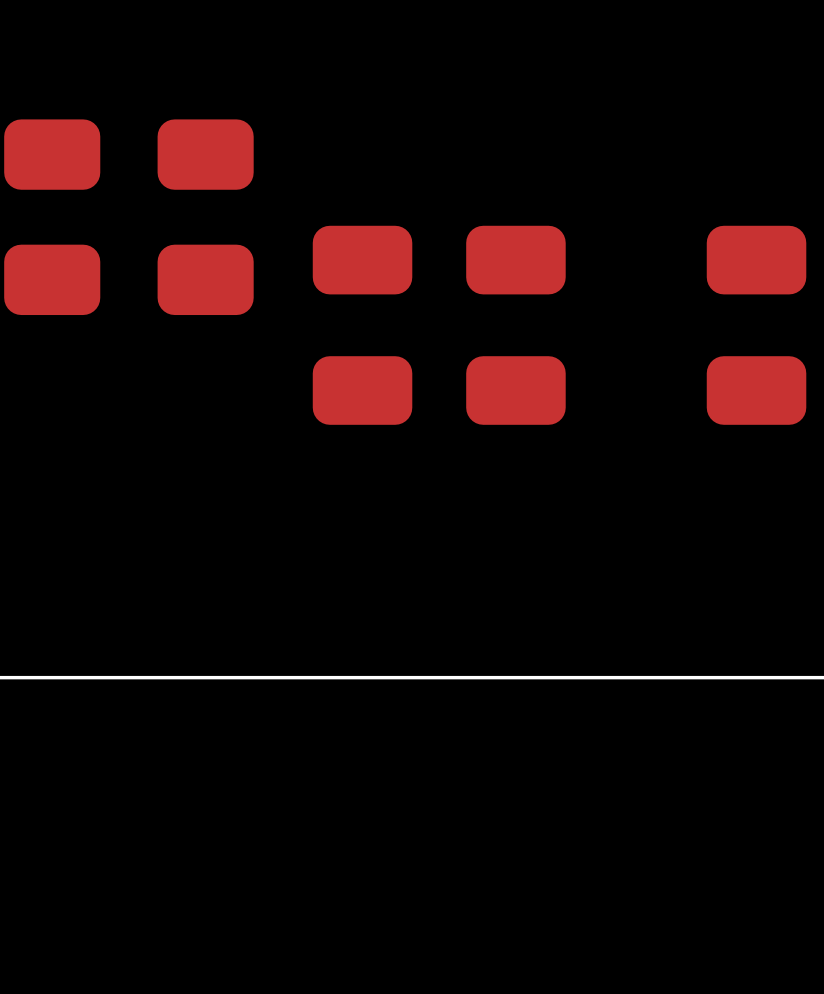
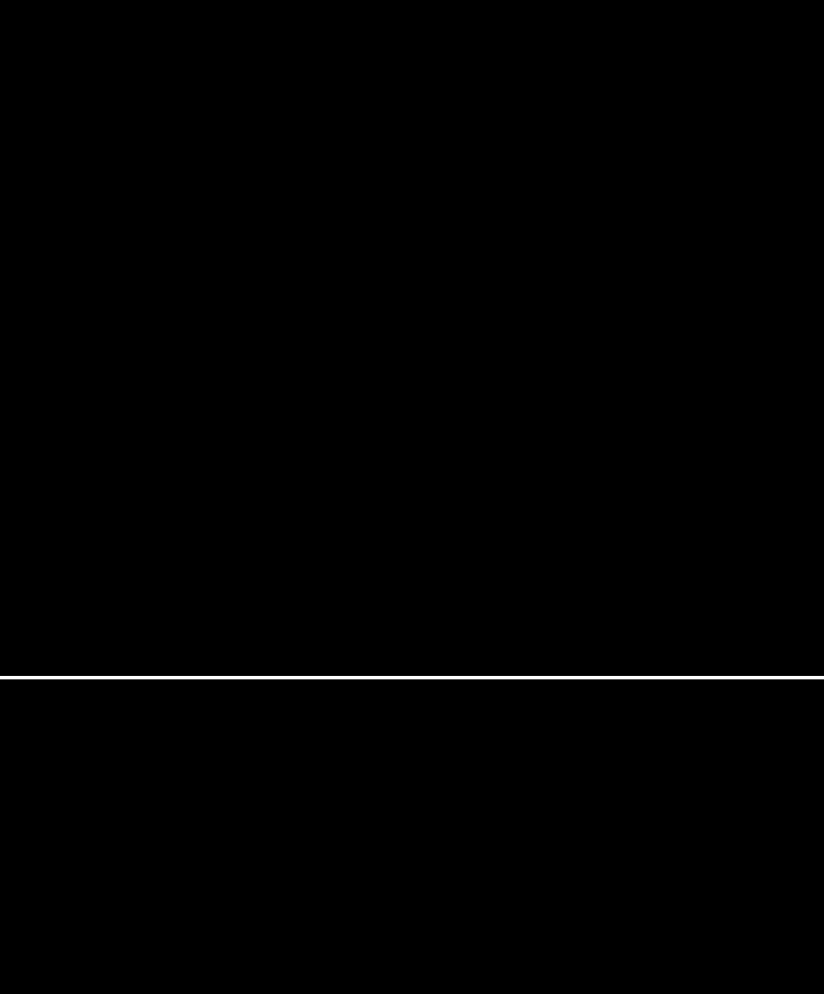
part: (52, 217) -> none
part: (205, 217) -> none
part: (362, 325) -> none
part: (515, 325) -> none
part: (756, 325) -> none

